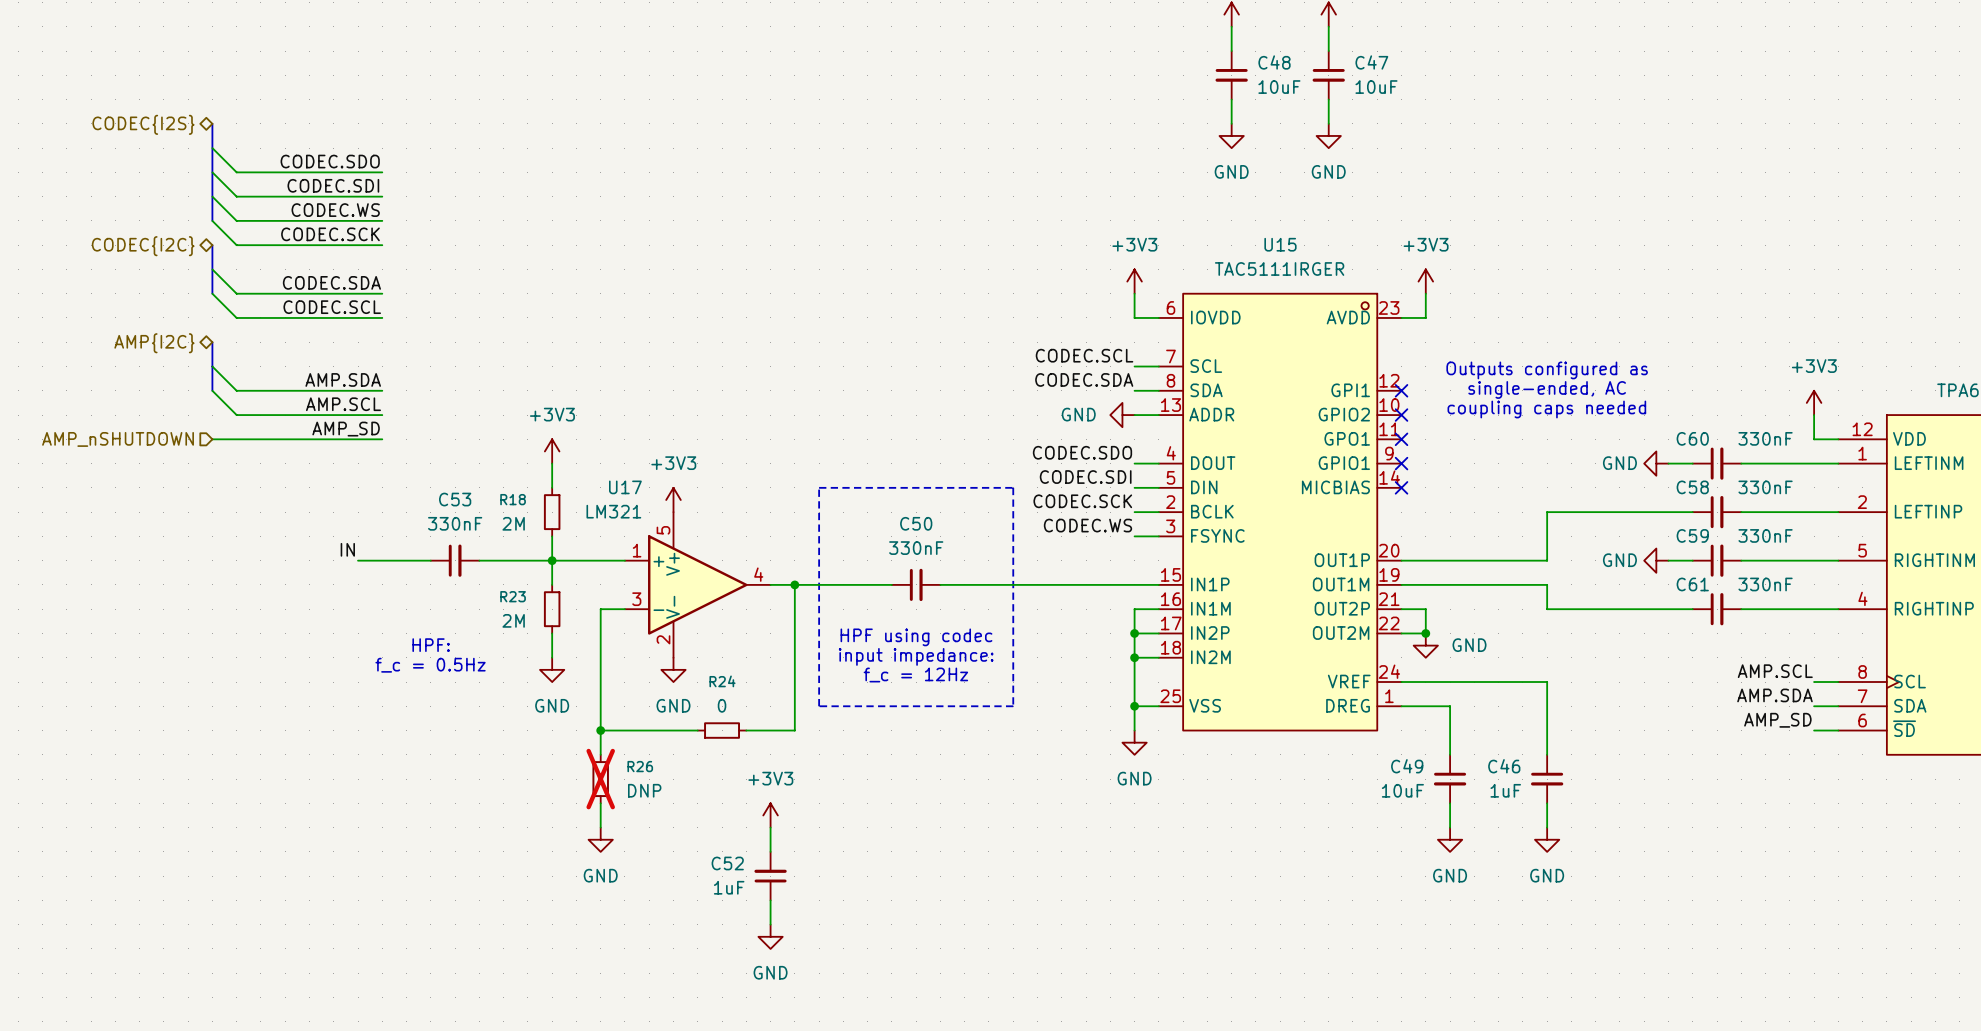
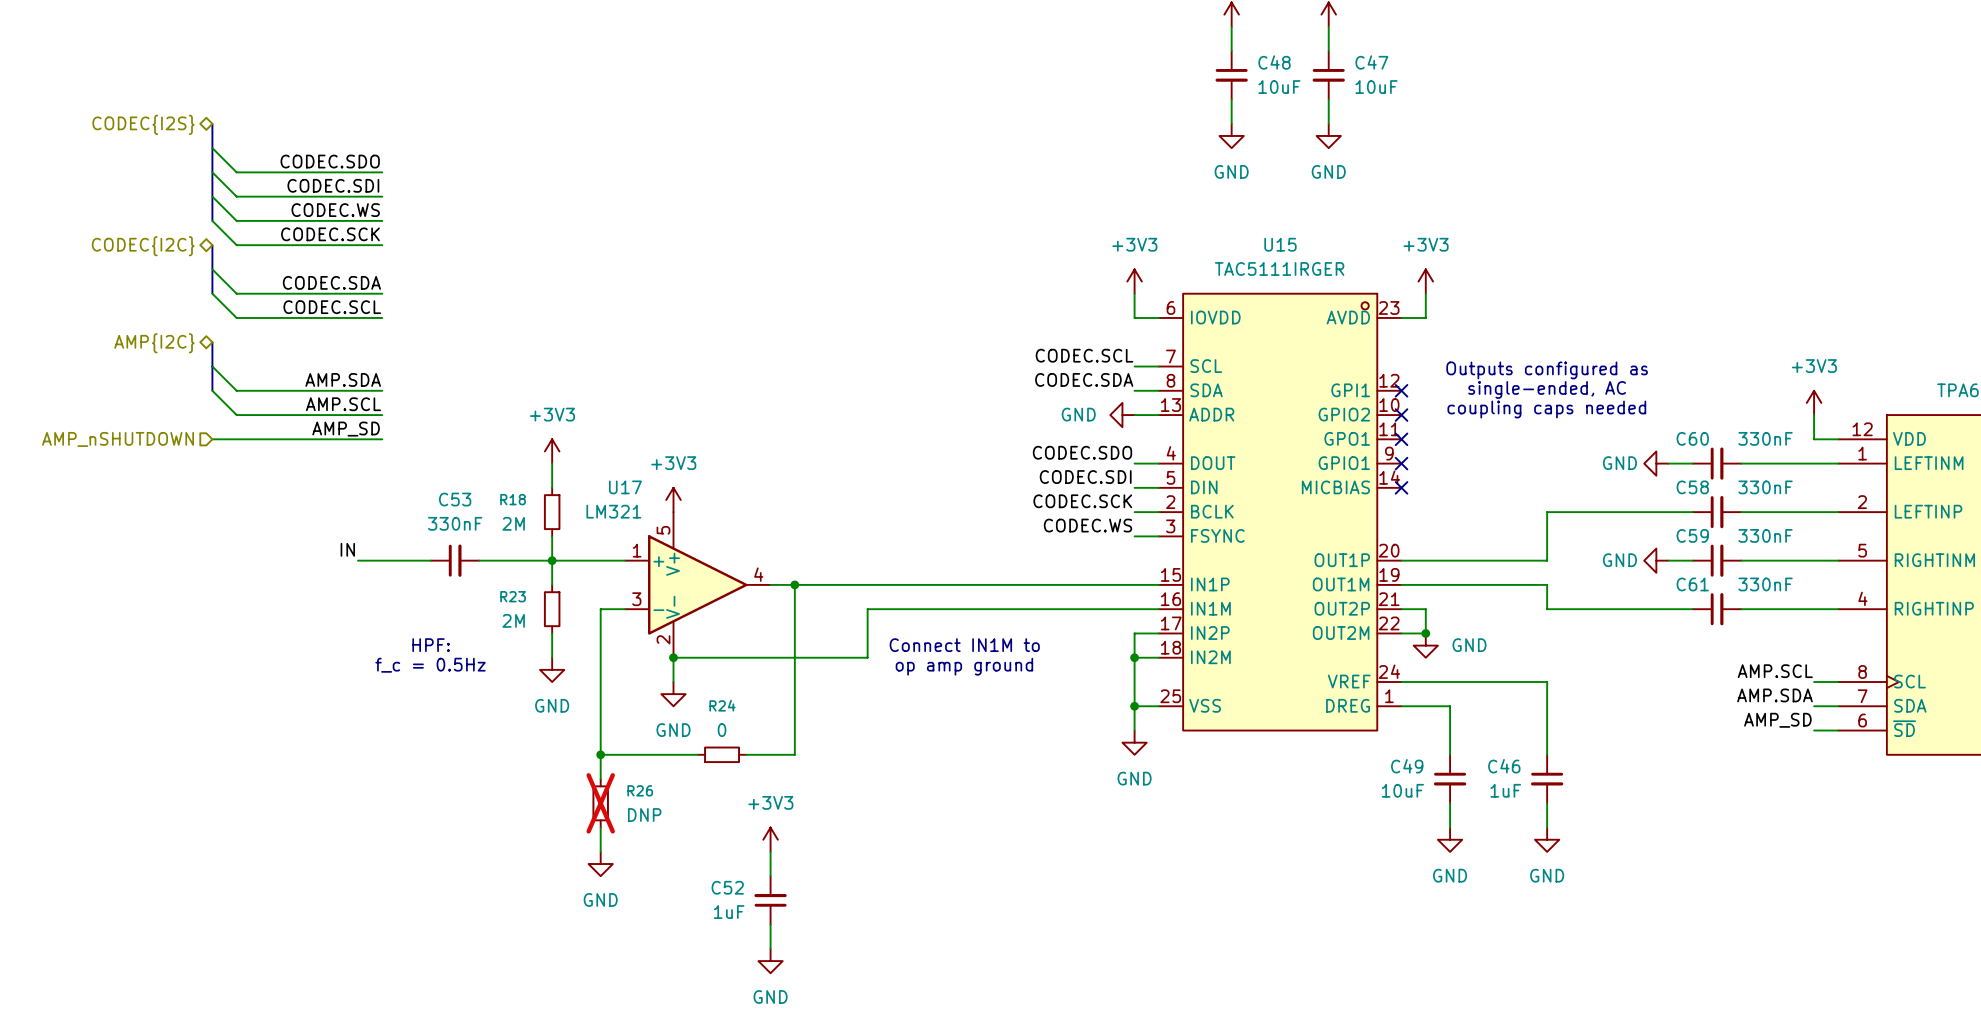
line: (819, 487) (1013, 487) (1013, 706) (819, 706) (819, 487) -> none
C50: 330nF (916, 584) -> none
wire: (1134, 609) (1134, 633) -> (1134, 609) (867, 609) (867, 657) (673, 657) (673, 682)
junction: (1134, 633) -> none
text: HPF using codec (916, 637) -> none
text: none -> Connect IN1M to (964, 645)
text: input impedance: (916, 656) -> none
junction: none -> (673, 657)
text: none -> op amp ground (964, 666)
power symbol position: GND (673, 669) -> GND (673, 694)
text: f_c = 12Hz (915, 675) -> none
wire: (600, 730) (697, 730) -> none
junction position: (600, 730) -> (600, 754)
R24 position: (722, 730) -> (722, 754)
wire: (746, 730) (794, 730) -> (746, 754) (794, 754) (794, 730)
wire: none -> (697, 754) (600, 754) (600, 779)
R26 position: (600, 779) -> (600, 803)
power symbol position: +3V3 (770, 815) -> +3V3 (770, 839)
power symbol position: GND (600, 839) -> GND (600, 864)
C52 position: (770, 876) -> (770, 900)
power symbol position: GND (770, 936) -> GND (770, 961)

